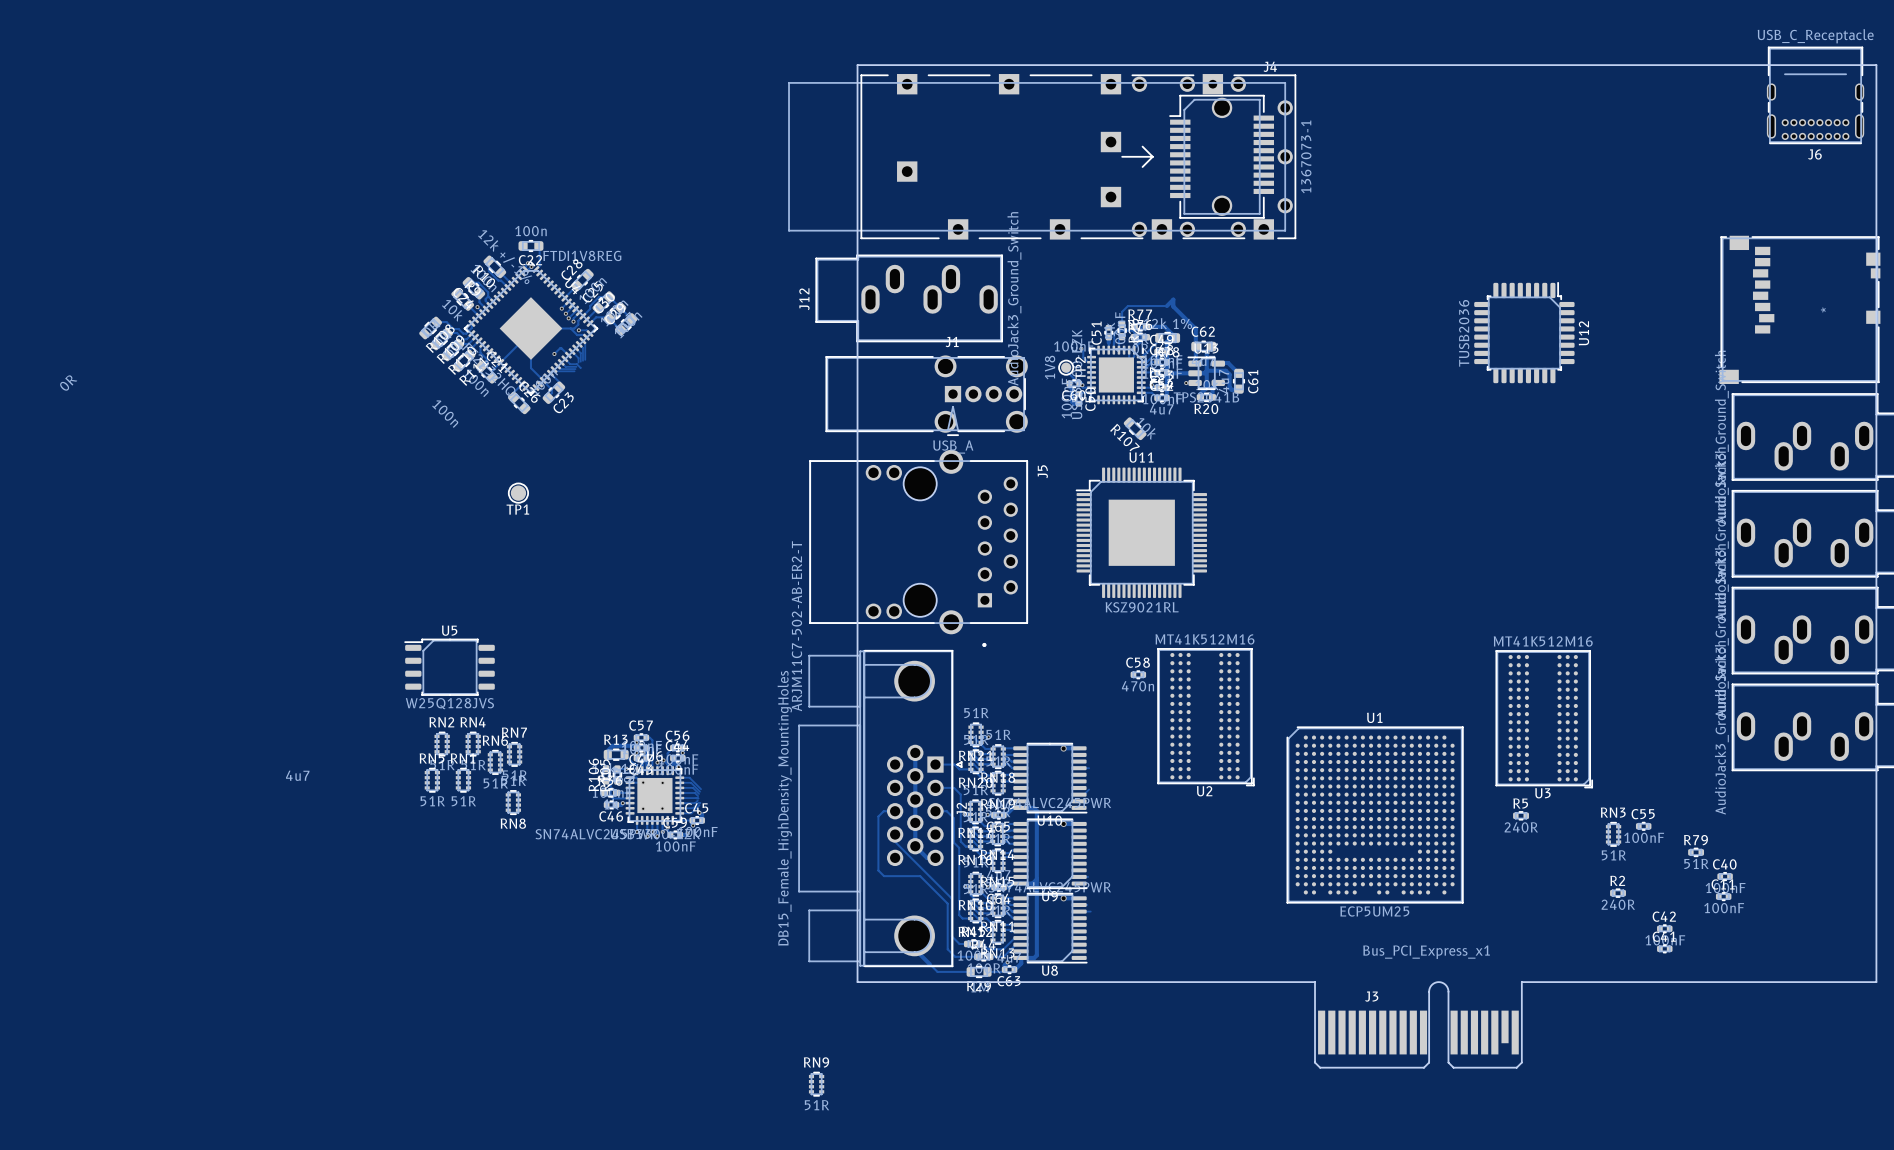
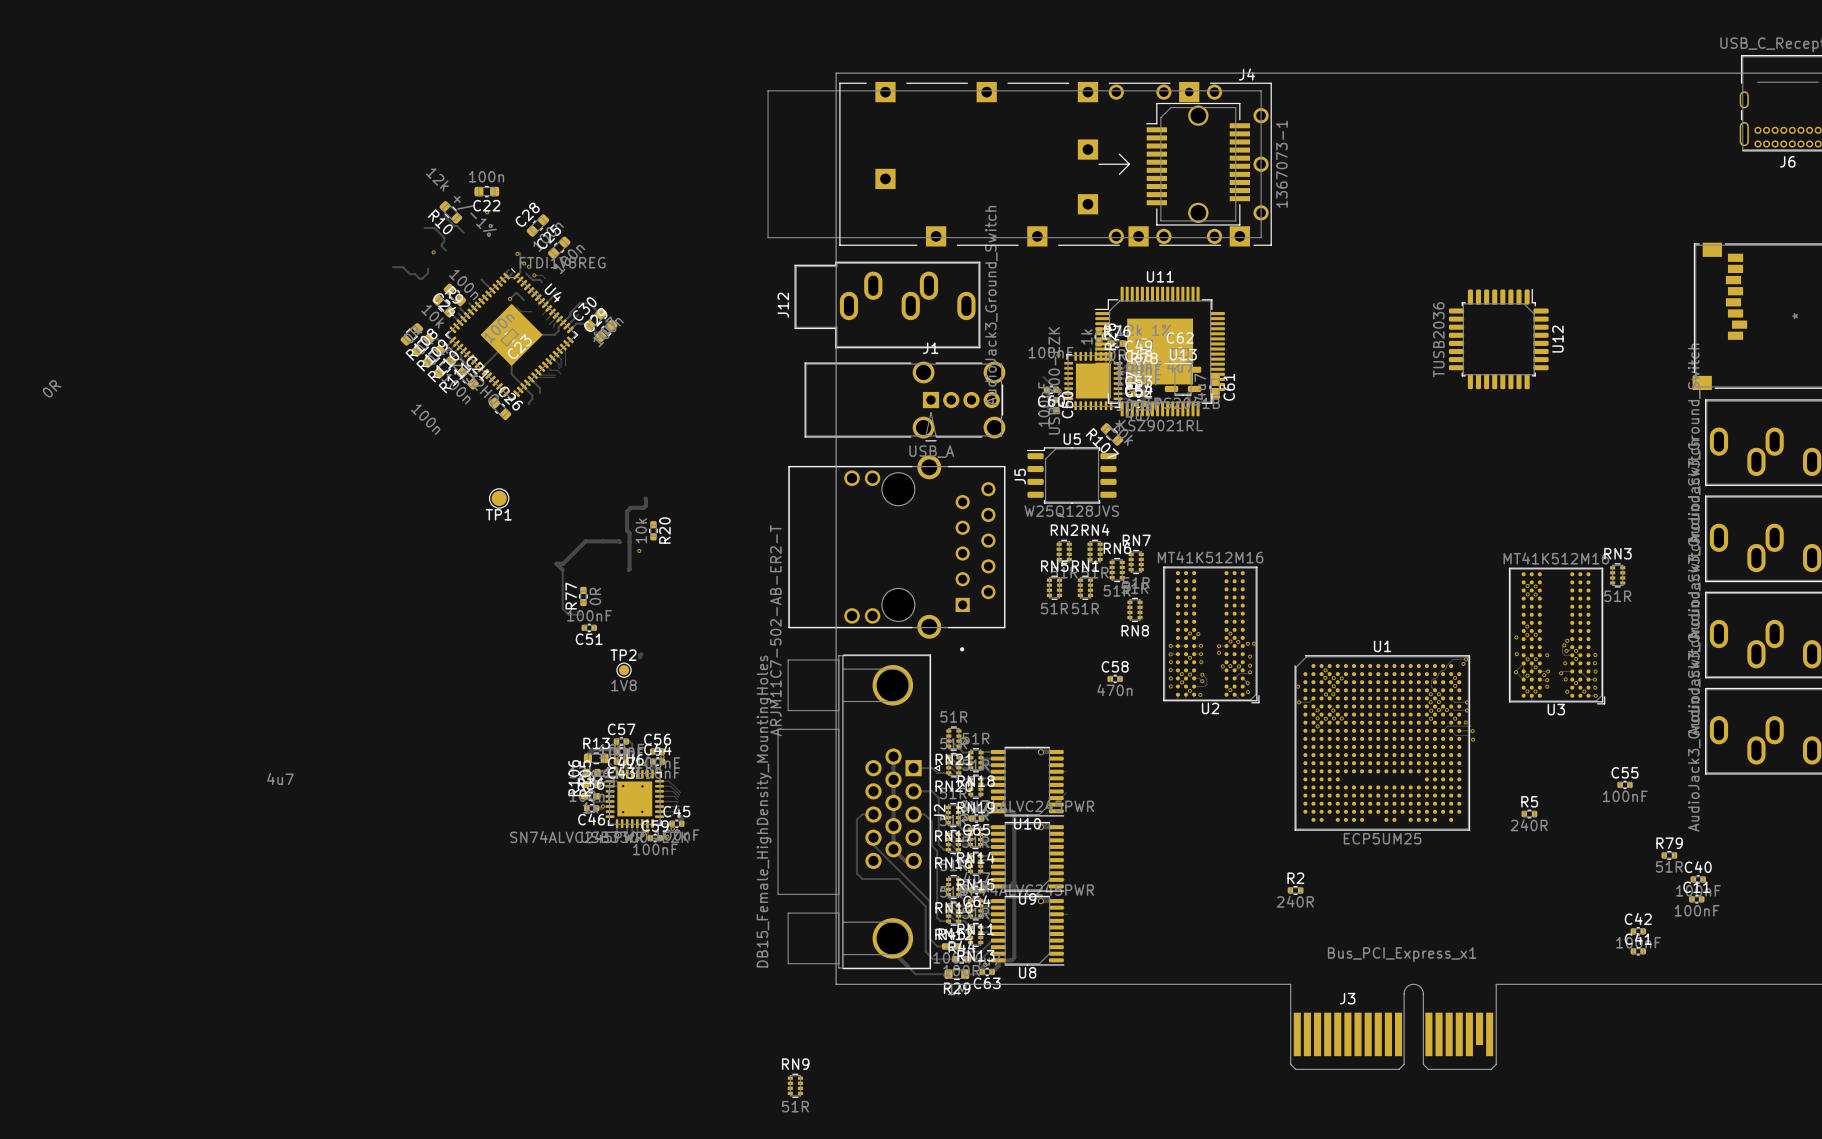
via: none -> (487, 212)
via: none -> (433, 252)
C22 position: (530, 245) -> (486, 191)
via: none -> (517, 253)
via: none -> (524, 263)
via: none -> (529, 266)
track: (488, 260) (488, 271) (507, 287) -> (444, 206) (444, 216) (463, 232)
via: (527, 263) -> none
R10 position: (494, 266) -> (450, 212)
via: (531, 266) -> none
via: none -> (534, 275)
C28 position: (582, 280) -> (537, 225)
track: (468, 282) (478, 282) (488, 292) (485, 301) (489, 305) -> (424, 228) (434, 228) (444, 237) (441, 246) (445, 250)
via: none -> (510, 298)
C25 position: (603, 302) -> (559, 247)
via: (477, 307) -> none
via: (561, 308) -> none
via: (565, 313) -> none
via: (568, 318) -> none
via: (573, 321) -> none
track: (436, 322) (446, 322) (453, 329) (458, 329) (463, 333) (466, 333) (471, 327) (471, 323) (471, 326) -> (392, 267) (402, 267) (409, 274) (414, 274) (419, 278) (422, 278) (428, 273) (428, 268) (428, 271)
track: (1122, 324) (1122, 311) (1127, 306) (1166, 306) (1173, 299) (1173, 306) (1195, 329) (1195, 363) -> none
R77 rotation: 0° (1140, 326) -> 90° clockwise (583, 596)
R77 position: (1140, 326) -> (583, 596)
track: (570, 328) (577, 335) (584, 334) (586, 337) -> (526, 273) (532, 280) (539, 279) (541, 282)
track: (578, 330) (586, 330) (590, 333) -> (534, 275) (542, 275) (545, 278)
via: (578, 330) -> none
C51 rotation: 0° (1108, 332) -> 90° clockwise (589, 627)
C51 position: (1108, 332) -> (589, 627)
track: (1134, 332) (1117, 330) (1114, 333) (1114, 343) -> none
track: (1108, 337) (1108, 350) -> none
track: (1159, 338) (1159, 340) (1141, 357) -> none
track: (579, 344) (583, 348) (583, 360) -> (534, 289) (538, 293) (538, 305)
track: (1211, 346) (1206, 351) (1206, 387) (1200, 394) (1200, 397) -> none
track: (1081, 348) (1083, 357) (1088, 362) (1091, 362) -> none
track: (554, 353) (561, 348) (568, 355) -> (510, 298) (517, 293) (523, 300)
via: (554, 353) -> none
track: (561, 362) (565, 366) (576, 366) -> (516, 307) (521, 311) (531, 311)
track: (1218, 363) (1228, 362) (1238, 373) -> none
TP2 value rotation: 0° (1050, 367) -> 90° clockwise (624, 685)
TP2 position: (1066, 367) -> (624, 670)
TP2 name rotation: 0° (1080, 368) -> 90° clockwise (623, 655)
track: (1166, 372) (1204, 373) (1206, 370) (1225, 370) (1229, 374) (1229, 387) (1231, 389) (1238, 389) -> none
via: (1186, 383) -> none
C23 position: (553, 392) -> (509, 337)
R20 rotation: 0° (1206, 397) -> 90° clockwise (653, 530)
R20 position: (1206, 397) -> (653, 530)
track: none -> (645, 498) (645, 505) (643, 507) (630, 507) (627, 511) (627, 530) (629, 533) (628, 570)
U11 position: (1141, 532) -> (1159, 351)
track: none -> (619, 542) (585, 541) (563, 563) (556, 563) (562, 570) (562, 608) (568, 614) (581, 614)
via: none -> (639, 550)
via: none -> (1527, 586)
via: none -> (1535, 586)
via: none -> (1527, 594)
via: none -> (1535, 594)
via: none -> (1527, 626)
via: none -> (1190, 633)
via: none -> (1198, 634)
via: none -> (1230, 633)
via: none -> (1527, 635)
via: none -> (1535, 634)
via: none -> (1516, 637)
via: none -> (1567, 640)
via: none -> (1230, 641)
via: none -> (1238, 641)
via: none -> (1247, 643)
via: none -> (1253, 643)
track: none -> (1564, 645) (1562, 653) (1564, 655) (1572, 655)
via: none -> (1564, 645)
via: none -> (1170, 645)
via: none -> (1200, 645)
via: none -> (1219, 646)
via: none -> (1566, 650)
via: none -> (1576, 650)
via: none -> (1219, 652)
track: none -> (641, 654) (640, 657)
via: none -> (1201, 654)
via: none -> (1516, 654)
via: none -> (1170, 654)
via: none -> (1547, 655)
via: none -> (1595, 655)
via: none -> (1250, 656)
via: none -> (1189, 657)
via: none -> (1535, 659)
via: none -> (1576, 658)
track: none -> (1466, 659) (1452, 659) (1431, 680) (1431, 686) (1434, 690)
via: none -> (1466, 659)
via: none -> (1527, 659)
via: none -> (1170, 662)
via: none -> (1201, 662)
via: none -> (1463, 663)
track: none -> (1523, 663) (1515, 671) (1523, 679) (1523, 663)
via: none -> (1565, 663)
via: none -> (1594, 663)
via: none -> (1230, 666)
via: none -> (1250, 665)
via: none -> (1222, 666)
via: none -> (1239, 666)
via: none -> (1535, 667)
via: none -> (1170, 670)
via: none -> (1325, 670)
U5 position: (449, 667) -> (1071, 475)
track: none -> (1539, 671) (1548, 671)
via: none -> (1548, 671)
track: none -> (1572, 671) (1562, 671) (1561, 673)
track: none -> (1580, 671) (1588, 679) (1594, 679)
via: none -> (1595, 671)
track: none -> (1250, 672) (1239, 673) (1234, 678)
via: none -> (1250, 672)
via: none -> (1515, 672)
via: none -> (1181, 674)
via: none -> (1561, 673)
via: none -> (1189, 674)
track: none -> (1202, 674) (1206, 678) (1206, 684) (1204, 686) (1194, 686)
via: none -> (1202, 674)
via: none -> (1527, 675)
via: none -> (1544, 675)
via: none -> (1325, 677)
via: none -> (1333, 678)
via: none -> (1455, 678)
via: none -> (1170, 678)
track: none -> (1194, 678) (1199, 678) (1202, 681)
via: none -> (1341, 678)
via: none -> (1547, 680)
via: none -> (1565, 679)
via: none -> (1594, 679)
via: none -> (1202, 681)
via: none -> (1182, 682)
via: none -> (1576, 683)
via: none -> (1247, 683)
via: none -> (1455, 685)
via: none -> (1170, 686)
via: none -> (1297, 686)
via: none -> (1333, 686)
via: none -> (1547, 686)
via: none -> (1595, 687)
via: none -> (1189, 690)
via: none -> (1230, 690)
via: none -> (1527, 691)
via: none -> (1535, 691)
via: none -> (1567, 691)
via: none -> (1584, 691)
via: none -> (1248, 692)
via: none -> (1200, 694)
via: none -> (1326, 694)
via: none -> (1333, 694)
via: none -> (1430, 694)
via: none -> (1438, 694)
via: none -> (1595, 695)
track: none -> (1313, 698) (1309, 702) (1299, 702)
track: none -> (1451, 698) (1455, 702) (1467, 702)
via: none -> (1299, 702)
via: none -> (1430, 702)
via: none -> (1438, 702)
via: none -> (1467, 702)
track: none -> (1451, 706) (1455, 710) (1467, 710)
via: none -> (1317, 710)
via: none -> (1333, 710)
via: none -> (1431, 710)
via: none -> (1438, 710)
via: none -> (1446, 710)
via: none -> (1467, 710)
via: none -> (1317, 718)
via: none -> (1325, 718)
via: none -> (1333, 718)
via: none -> (1341, 718)
via: none -> (1431, 718)
via: none -> (1455, 718)
U2 position: (1205, 717) -> (1211, 634)
via: none -> (1465, 722)
U3 position: (1544, 719) -> (1557, 636)
via: none -> (1317, 726)
track: none -> (1470, 726) (1447, 726) (1443, 730)
track: none -> (1451, 730) (1455, 735) (1469, 735)
via: none -> (1472, 731)
via: none -> (1473, 739)
RN2 position: (442, 744) -> (1064, 551)
RN4 position: (473, 744) -> (1095, 551)
RN7 position: (514, 754) -> (1136, 562)
RN6 position: (495, 762) -> (1117, 570)
RN5 position: (432, 780) -> (1054, 587)
RN1 position: (463, 780) -> (1085, 587)
RN8 position: (513, 802) -> (1134, 609)
U1 position: (1375, 814) -> (1382, 742)
R5 position: (1521, 815) -> (1529, 814)
C55 position: (1643, 826) -> (1625, 784)
RN3 position: (1613, 834) -> (1617, 575)
R2 position: (1618, 893) -> (1295, 890)

